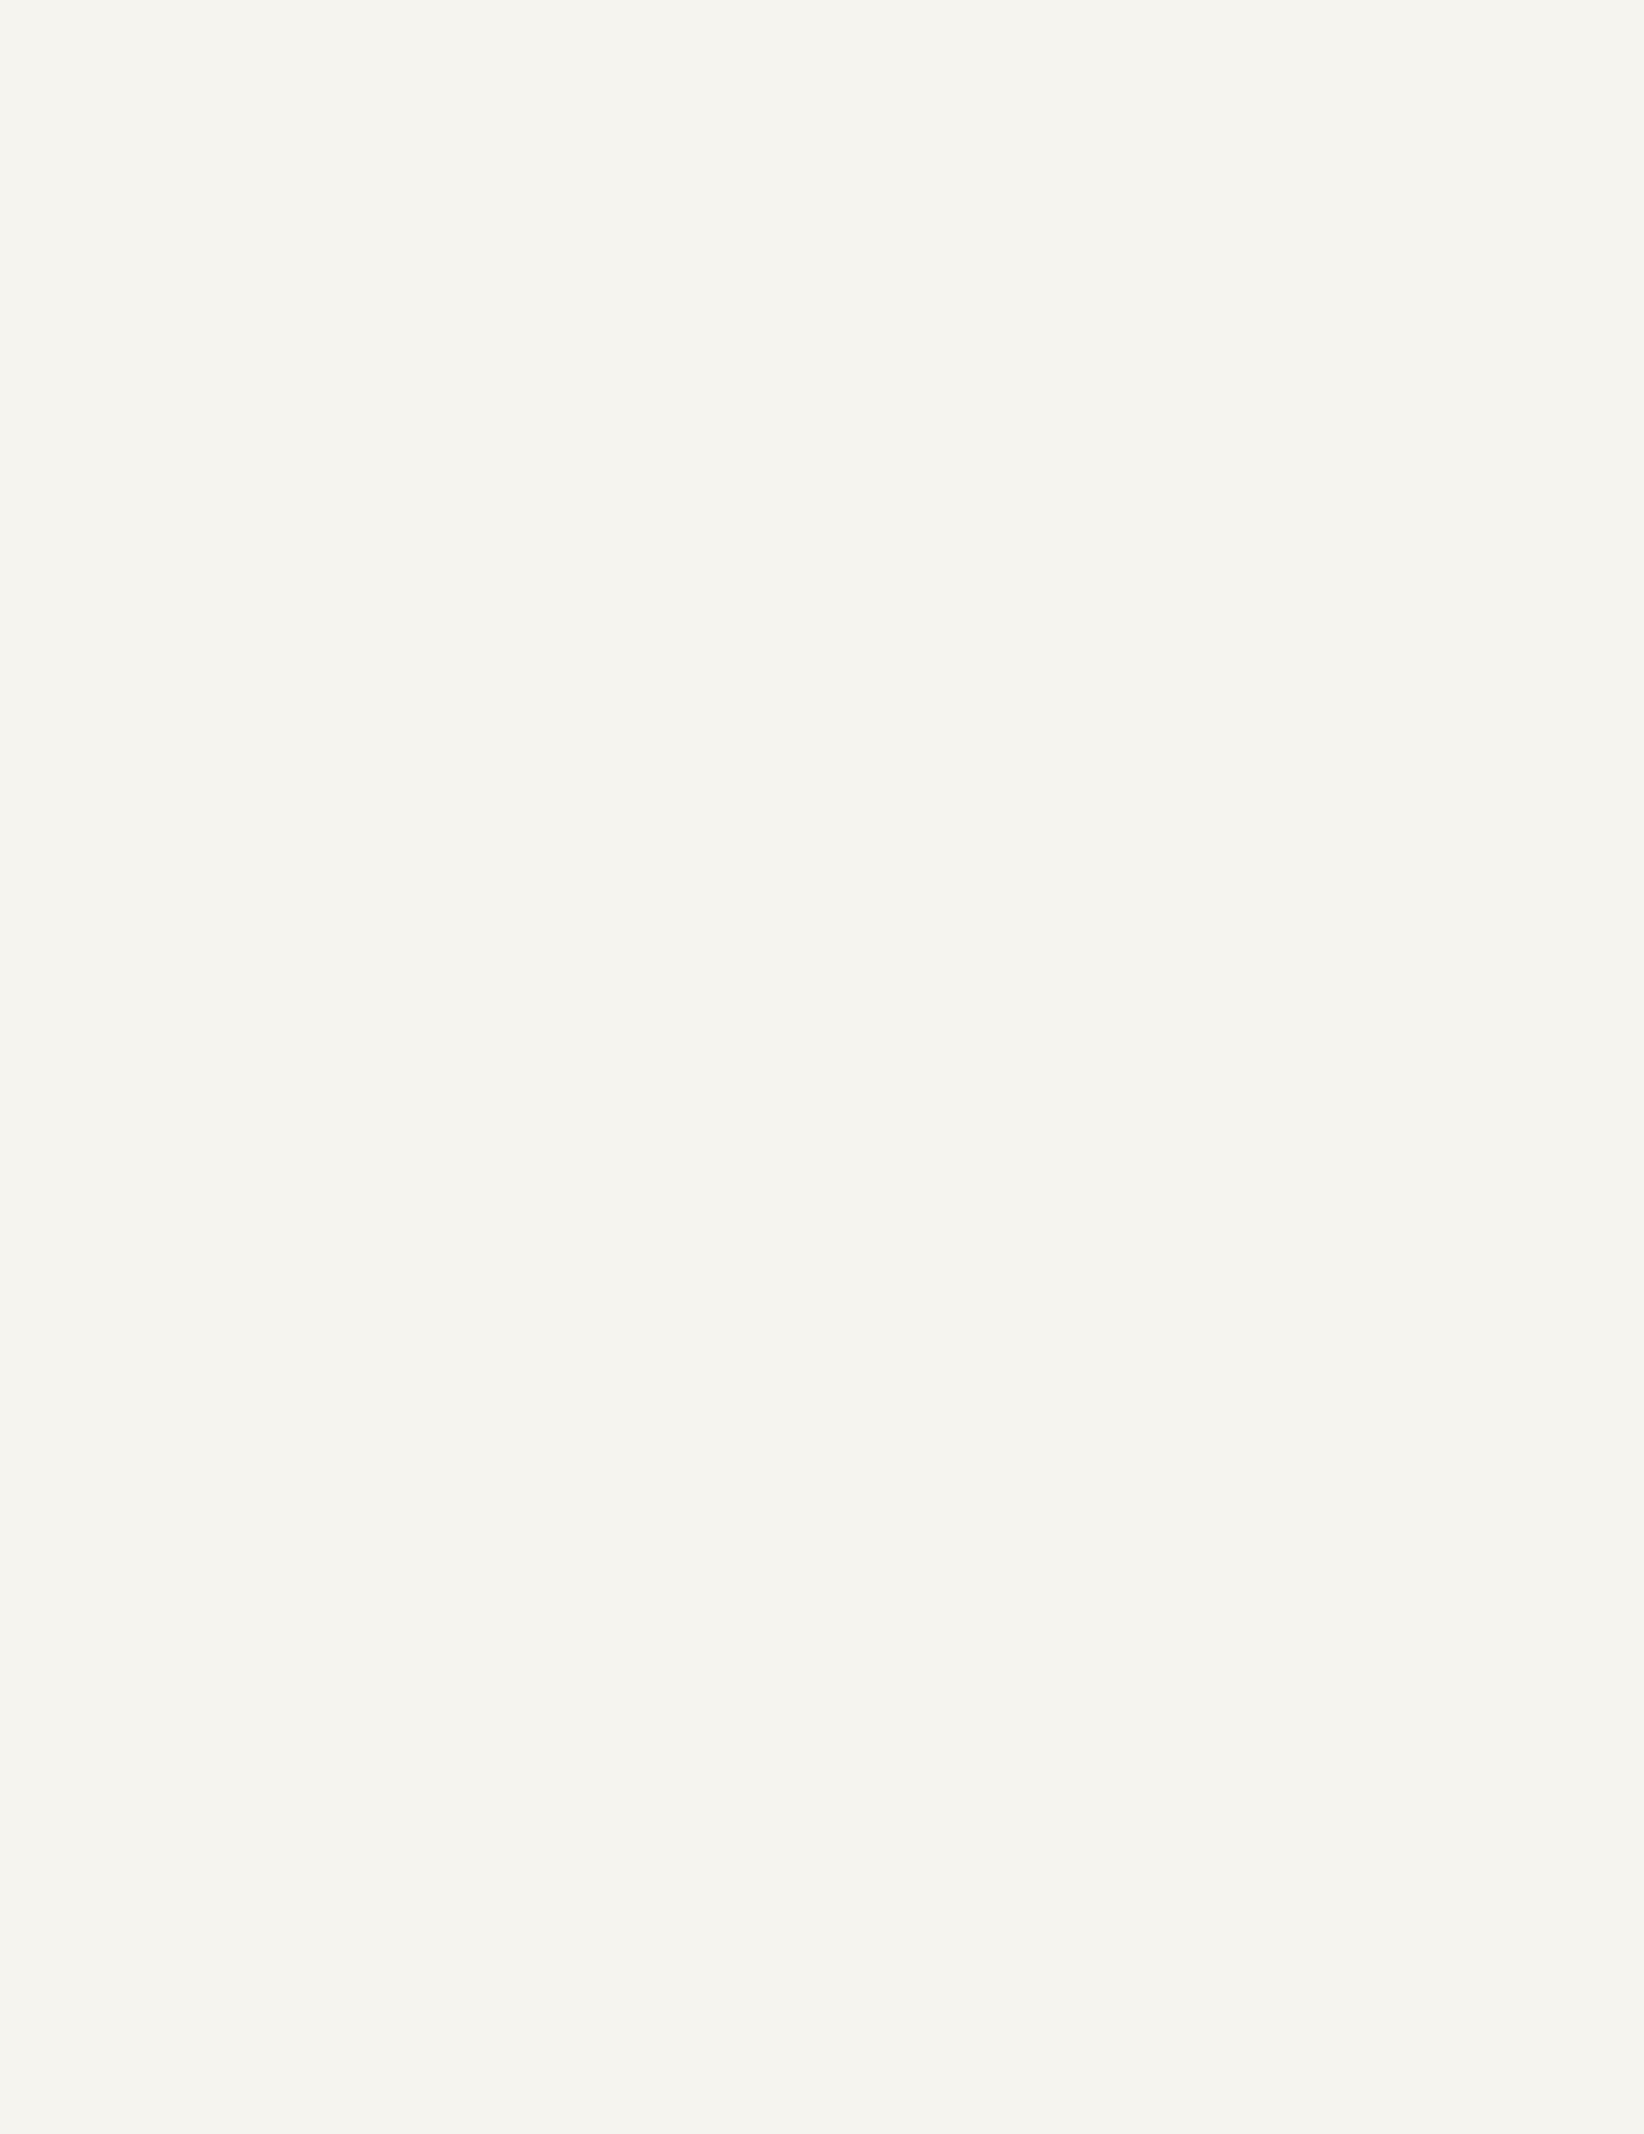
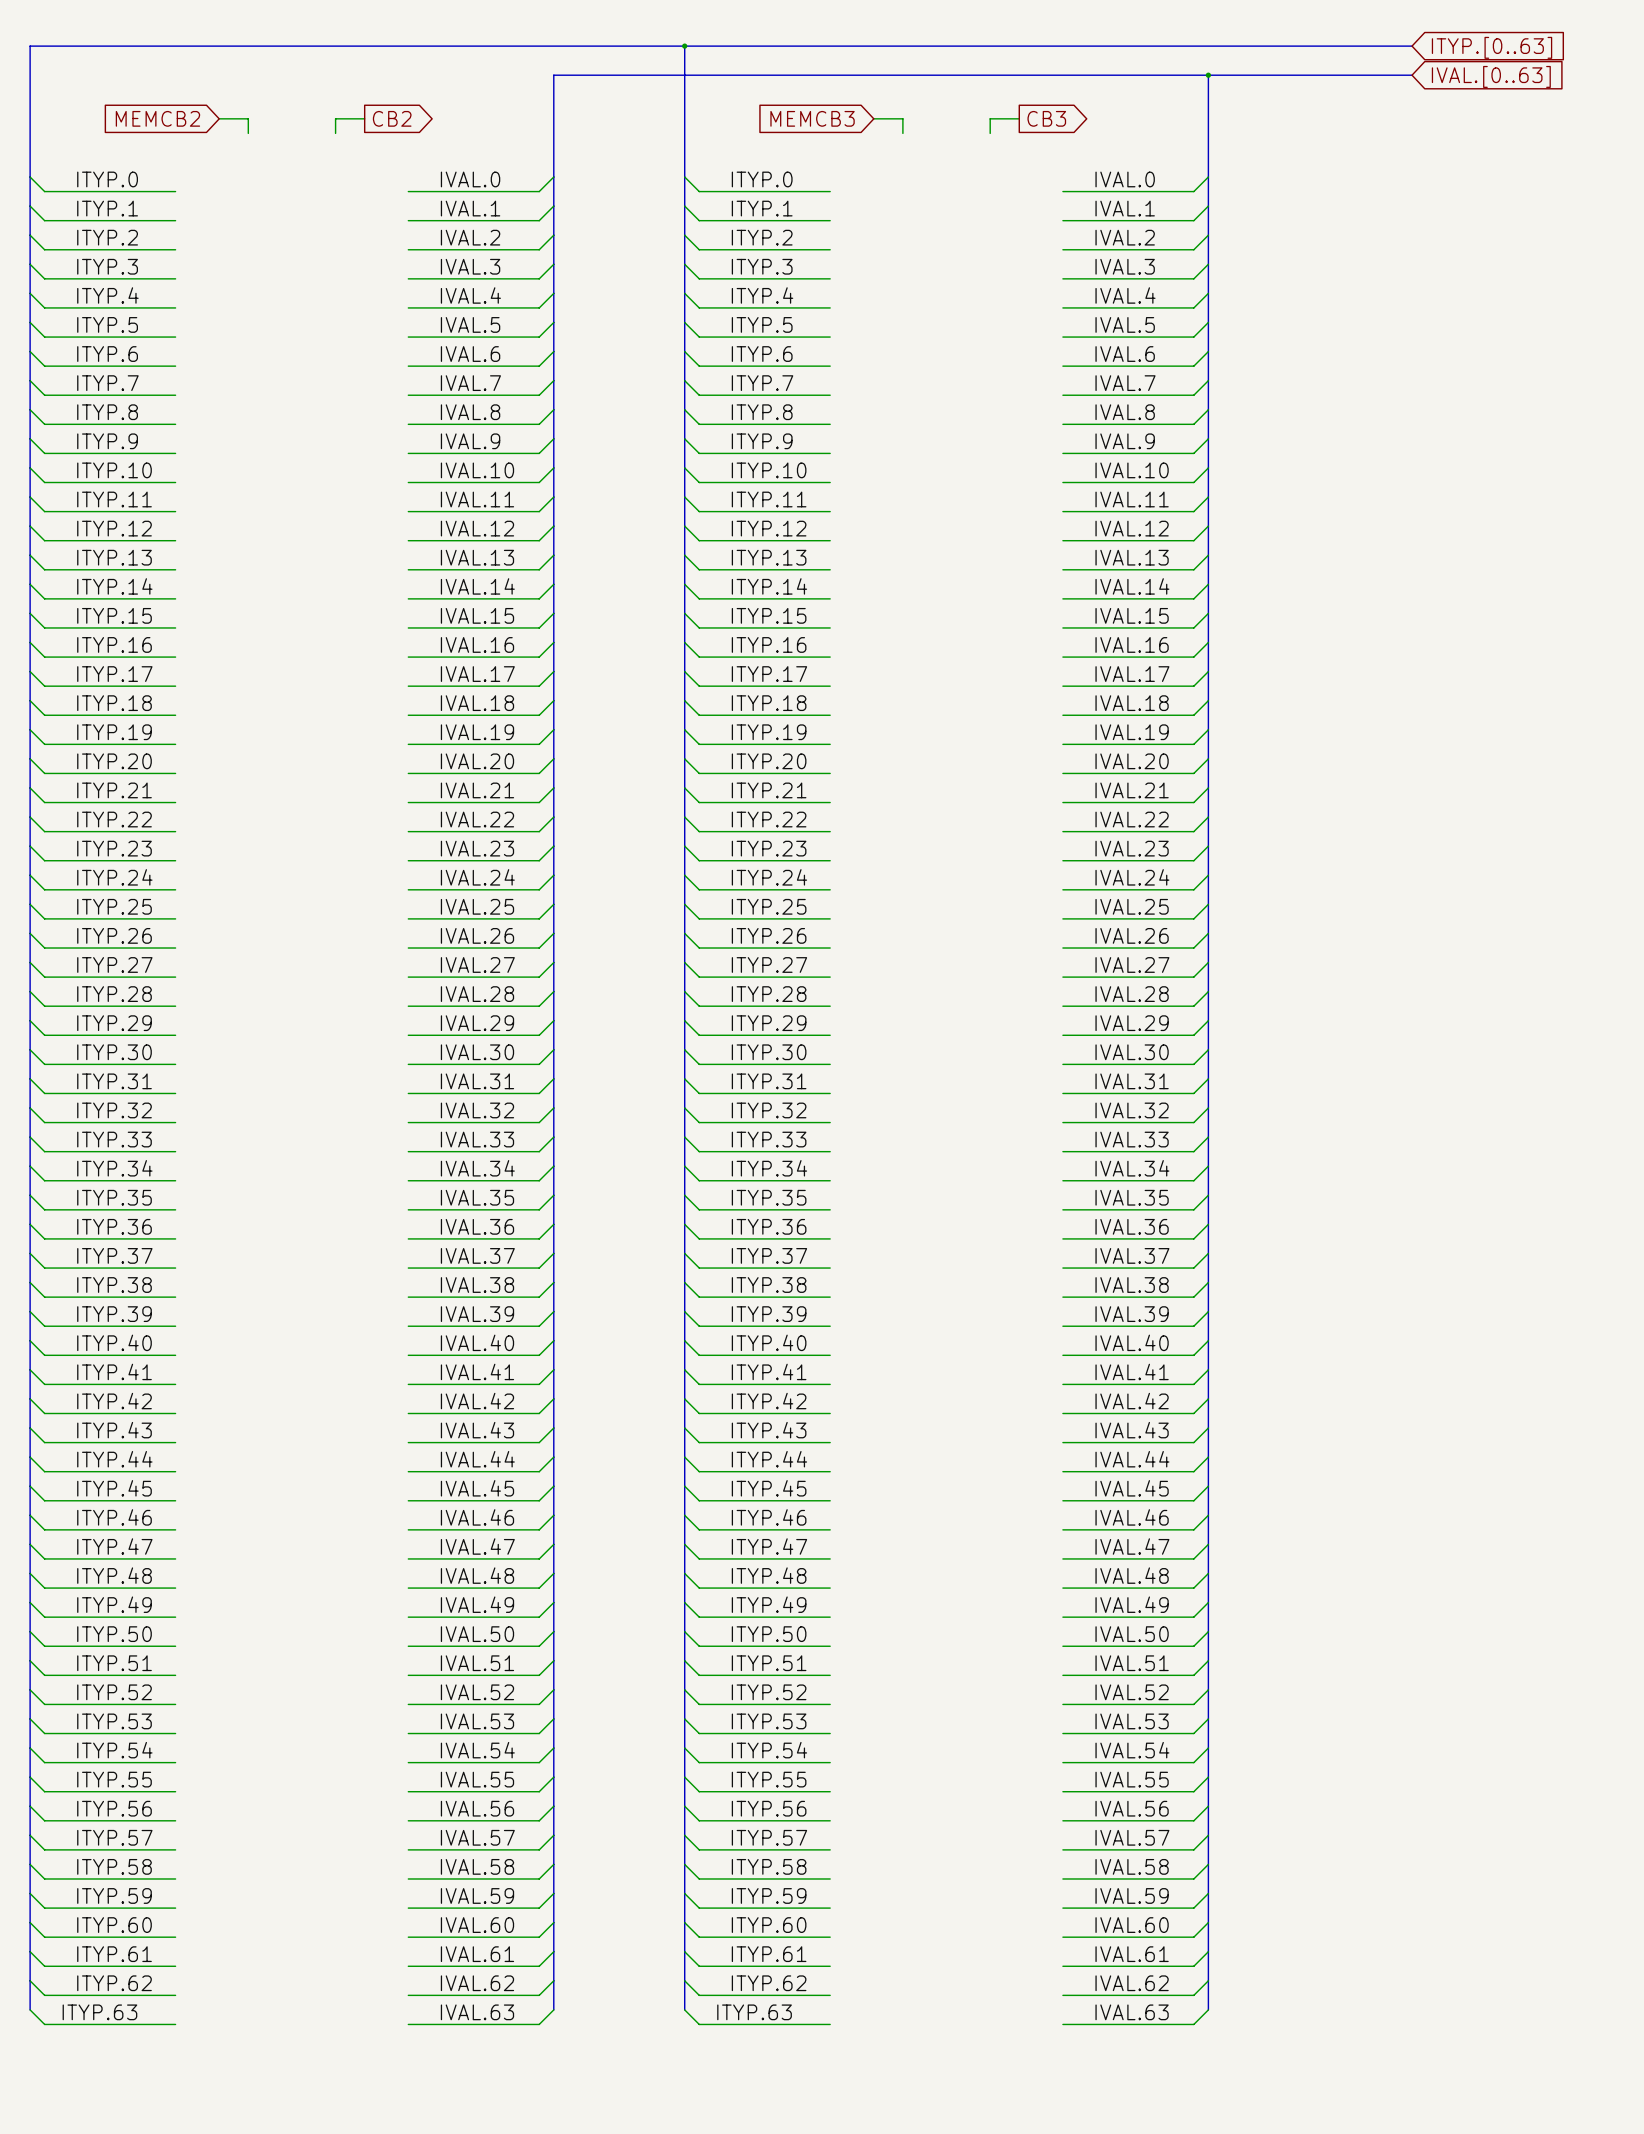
bus: none -> (684, 46) (684, 2009)
junction: none -> (684, 46)
bus: none -> (1412, 46) (30, 46) (30, 2009)
global label: none -> ITYP.[0..63] (1492, 47)
bus: none -> (1208, 75) (1208, 2009)
junction: none -> (1208, 75)
bus: none -> (1412, 75) (553, 75) (553, 2009)
global label: none -> IVAL.[0..63] (1491, 76)
global label: none -> MEMCB2 (157, 118)
wire: none -> (219, 118) (248, 118) (248, 133)
wire: none -> (364, 118) (335, 118) (335, 133)
global label: none -> CB2 (392, 118)
global label: none -> MEMCB3 (812, 118)
wire: none -> (873, 118) (902, 118) (902, 133)
wire: none -> (1019, 118) (990, 118) (990, 133)
global label: none -> CB3 (1046, 118)
wire: none -> (30, 177) (44, 191) (175, 191)
wire: none -> (553, 177) (539, 191) (408, 191)
wire: none -> (684, 177) (699, 191) (830, 191)
wire: none -> (1208, 177) (1193, 191) (1062, 191)
label: none -> ITYP.0 (107, 179)
label: none -> IVAL.0 (470, 179)
label: none -> ITYP.0 (762, 179)
label: none -> IVAL.0 (1125, 179)
wire: none -> (30, 206) (44, 220) (175, 220)
wire: none -> (553, 206) (539, 220) (408, 220)
wire: none -> (684, 206) (699, 220) (830, 220)
wire: none -> (1208, 206) (1193, 220) (1062, 220)
label: none -> ITYP.1 (107, 208)
label: none -> IVAL.1 (470, 208)
label: none -> ITYP.1 (762, 208)
label: none -> IVAL.1 (1125, 208)
wire: none -> (30, 235) (44, 249) (175, 249)
wire: none -> (553, 235) (539, 249) (408, 249)
wire: none -> (684, 235) (699, 249) (830, 249)
wire: none -> (1208, 235) (1193, 249) (1062, 249)
label: none -> ITYP.2 (107, 237)
label: none -> IVAL.2 (470, 237)
label: none -> ITYP.2 (762, 237)
label: none -> IVAL.2 (1125, 237)
wire: none -> (30, 264) (44, 278) (175, 278)
wire: none -> (553, 264) (539, 278) (408, 278)
wire: none -> (684, 264) (699, 278) (830, 278)
wire: none -> (1208, 264) (1193, 278) (1062, 278)
label: none -> ITYP.3 (107, 266)
label: none -> IVAL.3 (470, 266)
label: none -> ITYP.3 (762, 266)
label: none -> IVAL.3 (1125, 266)
wire: none -> (30, 293) (44, 307) (175, 307)
wire: none -> (553, 293) (539, 307) (408, 307)
wire: none -> (684, 293) (699, 307) (830, 307)
wire: none -> (1208, 293) (1193, 307) (1062, 307)
label: none -> ITYP.4 (107, 295)
label: none -> IVAL.4 (470, 295)
label: none -> ITYP.4 (762, 295)
label: none -> IVAL.4 (1125, 295)
wire: none -> (30, 322) (44, 337) (175, 337)
wire: none -> (553, 322) (539, 337) (408, 337)
wire: none -> (684, 322) (699, 337) (830, 337)
wire: none -> (1208, 322) (1193, 337) (1062, 337)
label: none -> ITYP.5 (107, 324)
label: none -> IVAL.5 (470, 324)
label: none -> ITYP.5 (762, 324)
label: none -> IVAL.5 (1125, 324)
wire: none -> (30, 351) (44, 366) (175, 366)
wire: none -> (553, 351) (539, 366) (408, 366)
wire: none -> (684, 351) (699, 366) (830, 366)
wire: none -> (1208, 351) (1193, 366) (1062, 366)
label: none -> ITYP.6 (107, 354)
label: none -> IVAL.6 (470, 354)
label: none -> ITYP.6 (762, 354)
label: none -> IVAL.6 (1125, 354)
wire: none -> (30, 380) (44, 395) (175, 395)
wire: none -> (553, 380) (539, 395) (408, 395)
wire: none -> (684, 380) (699, 395) (830, 395)
wire: none -> (1208, 380) (1193, 395) (1062, 395)
label: none -> ITYP.7 (107, 383)
label: none -> IVAL.7 (470, 383)
label: none -> ITYP.7 (762, 383)
label: none -> IVAL.7 (1125, 383)
wire: none -> (30, 409) (44, 424) (175, 424)
wire: none -> (553, 409) (539, 424) (408, 424)
wire: none -> (684, 409) (699, 424) (830, 424)
wire: none -> (1208, 409) (1193, 424) (1062, 424)
label: none -> ITYP.8 (107, 412)
label: none -> IVAL.8 (470, 412)
label: none -> ITYP.8 (762, 412)
label: none -> IVAL.8 (1125, 412)
wire: none -> (30, 438) (44, 453) (175, 453)
wire: none -> (553, 438) (539, 453) (408, 453)
wire: none -> (684, 438) (699, 453) (830, 453)
wire: none -> (1208, 438) (1193, 453) (1062, 453)
label: none -> ITYP.9 (107, 441)
label: none -> IVAL.9 (470, 441)
label: none -> ITYP.9 (762, 441)
label: none -> IVAL.9 (1125, 441)
wire: none -> (30, 467) (44, 482) (175, 482)
wire: none -> (553, 467) (539, 482) (408, 482)
wire: none -> (684, 467) (699, 482) (830, 482)
wire: none -> (1208, 467) (1193, 482) (1062, 482)
label: none -> ITYP.10 (114, 470)
label: none -> IVAL.10 (477, 470)
label: none -> ITYP.10 (769, 470)
label: none -> IVAL.10 (1132, 470)
wire: none -> (30, 497) (44, 511) (175, 511)
wire: none -> (553, 497) (539, 511) (408, 511)
wire: none -> (684, 497) (699, 511) (830, 511)
wire: none -> (1208, 497) (1193, 511) (1062, 511)
label: none -> ITYP.11 (114, 499)
label: none -> IVAL.11 (477, 499)
label: none -> ITYP.11 (769, 499)
label: none -> IVAL.11 (1132, 499)
wire: none -> (30, 526) (44, 540) (175, 540)
wire: none -> (553, 526) (539, 540) (408, 540)
wire: none -> (684, 526) (699, 540) (830, 540)
wire: none -> (1208, 526) (1193, 540) (1062, 540)
label: none -> ITYP.12 (114, 528)
label: none -> IVAL.12 (477, 528)
label: none -> ITYP.12 (769, 528)
label: none -> IVAL.12 (1132, 528)
wire: none -> (30, 555) (44, 569) (175, 569)
wire: none -> (553, 555) (539, 569) (408, 569)
wire: none -> (684, 555) (699, 569) (830, 569)
wire: none -> (1208, 555) (1193, 569) (1062, 569)
label: none -> ITYP.13 (114, 557)
label: none -> IVAL.13 (477, 557)
label: none -> ITYP.13 (769, 557)
label: none -> IVAL.13 (1132, 557)
wire: none -> (30, 584) (44, 598) (175, 598)
wire: none -> (553, 584) (539, 598) (408, 598)
wire: none -> (684, 584) (699, 598) (830, 598)
wire: none -> (1208, 584) (1193, 598) (1062, 598)
label: none -> ITYP.14 (114, 586)
label: none -> IVAL.14 (477, 586)
label: none -> ITYP.14 (769, 586)
label: none -> IVAL.14 (1132, 586)
wire: none -> (30, 613) (44, 627) (175, 627)
wire: none -> (553, 613) (539, 627) (408, 627)
wire: none -> (684, 613) (699, 627) (830, 627)
wire: none -> (1208, 613) (1193, 627) (1062, 627)
label: none -> ITYP.15 (114, 615)
label: none -> IVAL.15 (477, 615)
label: none -> ITYP.15 (769, 615)
label: none -> IVAL.15 (1132, 615)
wire: none -> (30, 642) (44, 657) (175, 657)
wire: none -> (553, 642) (539, 657) (408, 657)
wire: none -> (684, 642) (699, 657) (830, 657)
wire: none -> (1208, 642) (1193, 657) (1062, 657)
label: none -> ITYP.16 (114, 644)
label: none -> IVAL.16 (477, 644)
label: none -> ITYP.16 (769, 644)
label: none -> IVAL.16 (1132, 644)
wire: none -> (30, 671) (44, 686) (175, 686)
wire: none -> (553, 671) (539, 686) (408, 686)
wire: none -> (684, 671) (699, 686) (830, 686)
wire: none -> (1208, 671) (1193, 686) (1062, 686)
label: none -> ITYP.17 (114, 674)
label: none -> IVAL.17 (477, 674)
label: none -> ITYP.17 (769, 674)
label: none -> IVAL.17 (1132, 674)
wire: none -> (30, 700) (44, 715) (175, 715)
wire: none -> (553, 700) (539, 715) (408, 715)
wire: none -> (684, 700) (699, 715) (830, 715)
wire: none -> (1208, 700) (1193, 715) (1062, 715)
label: none -> ITYP.18 (114, 703)
label: none -> IVAL.18 (477, 703)
label: none -> ITYP.18 (769, 703)
label: none -> IVAL.18 (1132, 703)
wire: none -> (30, 729) (44, 744) (175, 744)
wire: none -> (553, 729) (539, 744) (408, 744)
wire: none -> (684, 729) (699, 744) (830, 744)
wire: none -> (1208, 729) (1193, 744) (1062, 744)
label: none -> ITYP.19 (114, 732)
label: none -> IVAL.19 (477, 732)
label: none -> ITYP.19 (769, 732)
label: none -> IVAL.19 (1132, 732)
wire: none -> (30, 758) (44, 773) (175, 773)
wire: none -> (553, 758) (539, 773) (408, 773)
wire: none -> (684, 758) (699, 773) (830, 773)
wire: none -> (1208, 758) (1193, 773) (1062, 773)
label: none -> ITYP.20 (114, 761)
label: none -> IVAL.20 (477, 761)
label: none -> ITYP.20 (769, 761)
label: none -> IVAL.20 (1132, 761)
wire: none -> (30, 787) (44, 802) (175, 802)
wire: none -> (553, 787) (539, 802) (408, 802)
wire: none -> (684, 787) (699, 802) (830, 802)
wire: none -> (1208, 787) (1193, 802) (1062, 802)
label: none -> ITYP.21 (114, 790)
label: none -> IVAL.21 (477, 790)
label: none -> ITYP.21 (769, 790)
label: none -> IVAL.21 (1132, 790)
wire: none -> (30, 817) (44, 831) (175, 831)
wire: none -> (553, 817) (539, 831) (408, 831)
wire: none -> (684, 817) (699, 831) (830, 831)
wire: none -> (1208, 817) (1193, 831) (1062, 831)
label: none -> ITYP.22 (114, 819)
label: none -> IVAL.22 (477, 819)
label: none -> ITYP.22 (769, 819)
label: none -> IVAL.22 (1132, 819)
wire: none -> (30, 846) (44, 860) (175, 860)
wire: none -> (553, 846) (539, 860) (408, 860)
wire: none -> (684, 846) (699, 860) (830, 860)
wire: none -> (1208, 846) (1193, 860) (1062, 860)
label: none -> ITYP.23 (114, 848)
label: none -> IVAL.23 (477, 848)
label: none -> ITYP.23 (769, 848)
label: none -> IVAL.23 (1132, 848)
wire: none -> (30, 875) (44, 889) (175, 889)
wire: none -> (553, 875) (539, 889) (408, 889)
wire: none -> (684, 875) (699, 889) (830, 889)
wire: none -> (1208, 875) (1193, 889) (1062, 889)
label: none -> ITYP.24 (114, 877)
label: none -> IVAL.24 (477, 877)
label: none -> ITYP.24 (769, 877)
label: none -> IVAL.24 (1132, 877)
wire: none -> (30, 904) (44, 918) (175, 918)
wire: none -> (553, 904) (539, 918) (408, 918)
wire: none -> (684, 904) (699, 918) (830, 918)
wire: none -> (1208, 904) (1193, 918) (1062, 918)
label: none -> ITYP.25 (114, 906)
label: none -> IVAL.25 (477, 906)
label: none -> ITYP.25 (769, 906)
label: none -> IVAL.25 (1132, 906)
wire: none -> (30, 933) (44, 948) (175, 948)
wire: none -> (553, 933) (539, 948) (408, 948)
wire: none -> (684, 933) (699, 948) (830, 948)
wire: none -> (1208, 933) (1193, 948) (1062, 948)
label: none -> ITYP.26 (114, 935)
label: none -> IVAL.26 (477, 935)
label: none -> ITYP.26 (769, 935)
label: none -> IVAL.26 (1132, 935)
wire: none -> (30, 962) (44, 977) (175, 977)
wire: none -> (553, 962) (539, 977) (408, 977)
wire: none -> (684, 962) (699, 977) (830, 977)
wire: none -> (1208, 962) (1193, 977) (1062, 977)
label: none -> ITYP.27 (114, 964)
label: none -> IVAL.27 (477, 964)
label: none -> ITYP.27 (769, 964)
label: none -> IVAL.27 (1132, 964)
wire: none -> (30, 991) (44, 1006) (175, 1006)
wire: none -> (553, 991) (539, 1006) (408, 1006)
wire: none -> (684, 991) (699, 1006) (830, 1006)
wire: none -> (1208, 991) (1193, 1006) (1062, 1006)
label: none -> ITYP.28 (114, 994)
label: none -> IVAL.28 (477, 994)
label: none -> ITYP.28 (769, 994)
label: none -> IVAL.28 (1132, 994)
wire: none -> (30, 1020) (44, 1035) (175, 1035)
wire: none -> (553, 1020) (539, 1035) (408, 1035)
wire: none -> (684, 1020) (699, 1035) (830, 1035)
wire: none -> (1208, 1020) (1193, 1035) (1062, 1035)
label: none -> ITYP.29 (114, 1023)
label: none -> IVAL.29 (477, 1023)
label: none -> ITYP.29 (769, 1023)
label: none -> IVAL.29 (1132, 1023)
wire: none -> (30, 1049) (44, 1064) (175, 1064)
wire: none -> (553, 1049) (539, 1064) (408, 1064)
wire: none -> (684, 1049) (699, 1064) (830, 1064)
wire: none -> (1208, 1049) (1193, 1064) (1062, 1064)
label: none -> ITYP.30 (114, 1052)
label: none -> IVAL.30 (477, 1052)
label: none -> ITYP.30 (769, 1052)
label: none -> IVAL.30 (1132, 1052)
wire: none -> (30, 1078) (44, 1093) (175, 1093)
wire: none -> (553, 1078) (539, 1093) (408, 1093)
wire: none -> (684, 1078) (699, 1093) (830, 1093)
wire: none -> (1208, 1078) (1193, 1093) (1062, 1093)
label: none -> ITYP.31 (114, 1081)
label: none -> IVAL.31 (477, 1081)
label: none -> ITYP.31 (769, 1081)
label: none -> IVAL.31 (1132, 1081)
wire: none -> (30, 1108) (44, 1122) (175, 1122)
wire: none -> (553, 1108) (539, 1122) (408, 1122)
wire: none -> (684, 1108) (699, 1122) (830, 1122)
wire: none -> (1208, 1108) (1193, 1122) (1062, 1122)
label: none -> ITYP.32 (114, 1110)
label: none -> IVAL.32 (477, 1110)
label: none -> ITYP.32 (769, 1110)
label: none -> IVAL.32 (1132, 1110)
wire: none -> (30, 1137) (44, 1151) (175, 1151)
wire: none -> (553, 1137) (539, 1151) (408, 1151)
wire: none -> (684, 1137) (699, 1151) (830, 1151)
wire: none -> (1208, 1137) (1193, 1151) (1062, 1151)
label: none -> ITYP.33 (114, 1139)
label: none -> IVAL.33 (477, 1139)
label: none -> ITYP.33 (769, 1139)
label: none -> IVAL.33 (1132, 1139)
wire: none -> (30, 1166) (44, 1180) (175, 1180)
wire: none -> (553, 1166) (539, 1180) (408, 1180)
wire: none -> (684, 1166) (699, 1180) (830, 1180)
wire: none -> (1208, 1166) (1193, 1180) (1062, 1180)
label: none -> ITYP.34 (114, 1168)
label: none -> IVAL.34 (477, 1168)
label: none -> ITYP.34 (769, 1168)
label: none -> IVAL.34 (1132, 1168)
wire: none -> (30, 1195) (44, 1209) (175, 1209)
wire: none -> (553, 1195) (539, 1209) (408, 1209)
wire: none -> (684, 1195) (699, 1209) (830, 1209)
wire: none -> (1208, 1195) (1193, 1209) (1062, 1209)
label: none -> ITYP.35 (114, 1197)
label: none -> IVAL.35 (477, 1197)
label: none -> ITYP.35 (769, 1197)
label: none -> IVAL.35 (1132, 1197)
wire: none -> (30, 1224) (44, 1238) (175, 1238)
wire: none -> (553, 1224) (539, 1238) (408, 1238)
wire: none -> (684, 1224) (699, 1238) (830, 1238)
wire: none -> (1208, 1224) (1193, 1238) (1062, 1238)
label: none -> ITYP.36 (114, 1226)
label: none -> IVAL.36 (477, 1226)
label: none -> ITYP.36 (769, 1226)
label: none -> IVAL.36 (1132, 1226)
wire: none -> (30, 1253) (44, 1268) (175, 1268)
wire: none -> (553, 1253) (539, 1268) (408, 1268)
wire: none -> (684, 1253) (699, 1268) (830, 1268)
wire: none -> (1208, 1253) (1193, 1268) (1062, 1268)
label: none -> ITYP.37 (114, 1255)
label: none -> IVAL.37 (477, 1255)
label: none -> ITYP.37 (769, 1255)
label: none -> IVAL.37 (1132, 1255)
wire: none -> (30, 1282) (44, 1297) (175, 1297)
wire: none -> (553, 1282) (539, 1297) (408, 1297)
wire: none -> (684, 1282) (699, 1297) (830, 1297)
wire: none -> (1208, 1282) (1193, 1297) (1062, 1297)
label: none -> ITYP.38 (114, 1285)
label: none -> IVAL.38 (477, 1285)
label: none -> ITYP.38 (769, 1285)
label: none -> IVAL.38 (1132, 1285)
wire: none -> (30, 1311) (44, 1326) (175, 1326)
wire: none -> (553, 1311) (539, 1326) (408, 1326)
wire: none -> (684, 1311) (699, 1326) (830, 1326)
wire: none -> (1208, 1311) (1193, 1326) (1062, 1326)
label: none -> ITYP.39 (114, 1314)
label: none -> IVAL.39 (477, 1314)
label: none -> ITYP.39 (769, 1314)
label: none -> IVAL.39 (1132, 1314)
wire: none -> (30, 1340) (44, 1355) (175, 1355)
wire: none -> (553, 1340) (539, 1355) (408, 1355)
wire: none -> (684, 1340) (699, 1355) (830, 1355)
wire: none -> (1208, 1340) (1193, 1355) (1062, 1355)
label: none -> ITYP.40 (114, 1342)
label: none -> IVAL.40 (477, 1342)
label: none -> ITYP.40 (769, 1342)
label: none -> IVAL.40 (1132, 1342)
wire: none -> (30, 1369) (44, 1384) (175, 1384)
wire: none -> (553, 1369) (539, 1384) (408, 1384)
wire: none -> (684, 1369) (699, 1384) (830, 1384)
wire: none -> (1208, 1369) (1193, 1384) (1062, 1384)
label: none -> ITYP.41 (114, 1371)
label: none -> IVAL.41 (477, 1371)
label: none -> ITYP.41 (769, 1371)
label: none -> IVAL.41 (1132, 1371)
wire: none -> (30, 1398) (44, 1413) (175, 1413)
wire: none -> (553, 1398) (539, 1413) (408, 1413)
wire: none -> (684, 1398) (699, 1413) (830, 1413)
wire: none -> (1208, 1398) (1193, 1413) (1062, 1413)
label: none -> ITYP.42 (114, 1401)
label: none -> IVAL.42 (477, 1401)
label: none -> ITYP.42 (769, 1401)
label: none -> IVAL.42 (1132, 1401)
wire: none -> (30, 1428) (44, 1442) (175, 1442)
wire: none -> (553, 1428) (539, 1442) (408, 1442)
wire: none -> (684, 1428) (699, 1442) (830, 1442)
wire: none -> (1208, 1428) (1193, 1442) (1062, 1442)
label: none -> ITYP.43 (114, 1430)
label: none -> IVAL.43 (477, 1430)
label: none -> ITYP.43 (769, 1430)
label: none -> IVAL.43 (1132, 1430)
wire: none -> (30, 1457) (44, 1471) (175, 1471)
wire: none -> (553, 1457) (539, 1471) (408, 1471)
wire: none -> (684, 1457) (699, 1471) (830, 1471)
wire: none -> (1208, 1457) (1193, 1471) (1062, 1471)
label: none -> ITYP.44 (114, 1459)
label: none -> IVAL.44 (477, 1459)
label: none -> ITYP.44 (769, 1459)
label: none -> IVAL.44 (1132, 1459)
wire: none -> (30, 1486) (44, 1500) (175, 1500)
wire: none -> (553, 1486) (539, 1500) (408, 1500)
wire: none -> (684, 1486) (699, 1500) (830, 1500)
wire: none -> (1208, 1486) (1193, 1500) (1062, 1500)
label: none -> ITYP.45 (114, 1488)
label: none -> IVAL.45 (477, 1488)
label: none -> ITYP.45 (769, 1488)
label: none -> IVAL.45 (1132, 1488)
wire: none -> (30, 1515) (44, 1529) (175, 1529)
wire: none -> (553, 1515) (539, 1529) (408, 1529)
wire: none -> (684, 1515) (699, 1529) (830, 1529)
wire: none -> (1208, 1515) (1193, 1529) (1062, 1529)
label: none -> ITYP.46 (114, 1517)
label: none -> IVAL.46 (477, 1517)
label: none -> ITYP.46 (769, 1517)
label: none -> IVAL.46 (1132, 1517)
wire: none -> (30, 1544) (44, 1558) (175, 1558)
wire: none -> (553, 1544) (539, 1558) (408, 1558)
wire: none -> (684, 1544) (699, 1558) (830, 1558)
wire: none -> (1208, 1544) (1193, 1558) (1062, 1558)
label: none -> ITYP.47 (114, 1546)
label: none -> IVAL.47 (477, 1546)
label: none -> ITYP.47 (769, 1546)
label: none -> IVAL.47 (1132, 1546)
wire: none -> (30, 1573) (44, 1588) (175, 1588)
wire: none -> (553, 1573) (539, 1588) (408, 1588)
wire: none -> (684, 1573) (699, 1588) (830, 1588)
wire: none -> (1208, 1573) (1193, 1588) (1062, 1588)
label: none -> ITYP.48 (114, 1575)
label: none -> IVAL.48 (477, 1575)
label: none -> ITYP.48 (769, 1575)
label: none -> IVAL.48 (1132, 1575)
wire: none -> (30, 1602) (44, 1617) (175, 1617)
wire: none -> (553, 1602) (539, 1617) (408, 1617)
wire: none -> (684, 1602) (699, 1617) (830, 1617)
wire: none -> (1208, 1602) (1193, 1617) (1062, 1617)
label: none -> ITYP.49 (114, 1604)
label: none -> IVAL.49 (477, 1604)
label: none -> ITYP.49 (769, 1604)
label: none -> IVAL.49 (1132, 1604)
wire: none -> (30, 1631) (44, 1646) (175, 1646)
wire: none -> (553, 1631) (539, 1646) (408, 1646)
wire: none -> (684, 1631) (699, 1646) (830, 1646)
wire: none -> (1208, 1631) (1193, 1646) (1062, 1646)
label: none -> ITYP.50 (114, 1634)
label: none -> IVAL.50 (477, 1634)
label: none -> ITYP.50 (769, 1634)
label: none -> IVAL.50 (1132, 1634)
wire: none -> (30, 1660) (44, 1675) (175, 1675)
wire: none -> (553, 1660) (539, 1675) (408, 1675)
wire: none -> (684, 1660) (699, 1675) (830, 1675)
wire: none -> (1208, 1660) (1193, 1675) (1062, 1675)
label: none -> ITYP.51 (114, 1663)
label: none -> IVAL.51 (477, 1663)
label: none -> ITYP.51 (769, 1663)
label: none -> IVAL.51 (1132, 1663)
wire: none -> (30, 1689) (44, 1704) (175, 1704)
wire: none -> (553, 1689) (539, 1704) (408, 1704)
wire: none -> (684, 1689) (699, 1704) (830, 1704)
wire: none -> (1208, 1689) (1193, 1704) (1062, 1704)
label: none -> ITYP.52 (114, 1692)
label: none -> IVAL.52 (477, 1692)
label: none -> ITYP.52 (769, 1692)
label: none -> IVAL.52 (1132, 1692)
wire: none -> (30, 1718) (44, 1733) (175, 1733)
wire: none -> (553, 1718) (539, 1733) (408, 1733)
wire: none -> (684, 1718) (699, 1733) (830, 1733)
wire: none -> (1208, 1718) (1193, 1733) (1062, 1733)
label: none -> ITYP.53 (114, 1721)
label: none -> IVAL.53 (477, 1721)
label: none -> ITYP.53 (769, 1721)
label: none -> IVAL.53 (1132, 1721)
wire: none -> (30, 1748) (44, 1762) (175, 1762)
wire: none -> (553, 1748) (539, 1762) (408, 1762)
wire: none -> (684, 1748) (699, 1762) (830, 1762)
wire: none -> (1208, 1748) (1193, 1762) (1062, 1762)
label: none -> ITYP.54 (114, 1750)
label: none -> IVAL.54 (477, 1750)
label: none -> ITYP.54 (769, 1750)
label: none -> IVAL.54 (1132, 1750)
wire: none -> (30, 1777) (44, 1791) (175, 1791)
wire: none -> (553, 1777) (539, 1791) (408, 1791)
wire: none -> (684, 1777) (699, 1791) (830, 1791)
wire: none -> (1208, 1777) (1193, 1791) (1062, 1791)
label: none -> ITYP.55 (114, 1779)
label: none -> IVAL.55 (477, 1779)
label: none -> ITYP.55 (769, 1779)
label: none -> IVAL.55 (1132, 1779)
wire: none -> (30, 1806) (44, 1820) (175, 1820)
wire: none -> (553, 1806) (539, 1820) (408, 1820)
wire: none -> (684, 1806) (699, 1820) (830, 1820)
wire: none -> (1208, 1806) (1193, 1820) (1062, 1820)
label: none -> ITYP.56 (114, 1808)
label: none -> IVAL.56 (477, 1808)
label: none -> ITYP.56 (769, 1808)
label: none -> IVAL.56 (1132, 1808)
wire: none -> (30, 1835) (44, 1849) (175, 1849)
wire: none -> (553, 1835) (539, 1849) (408, 1849)
wire: none -> (684, 1835) (699, 1849) (830, 1849)
wire: none -> (1208, 1835) (1193, 1849) (1062, 1849)
label: none -> ITYP.57 (114, 1837)
label: none -> IVAL.57 (477, 1837)
label: none -> ITYP.57 (769, 1837)
label: none -> IVAL.57 (1132, 1837)
wire: none -> (30, 1864) (44, 1878) (175, 1878)
wire: none -> (553, 1864) (539, 1878) (408, 1878)
wire: none -> (684, 1864) (699, 1878) (830, 1878)
wire: none -> (1208, 1864) (1193, 1878) (1062, 1878)
label: none -> ITYP.58 (114, 1866)
label: none -> IVAL.58 (477, 1866)
label: none -> ITYP.58 (769, 1866)
label: none -> IVAL.58 (1132, 1866)
wire: none -> (30, 1893) (44, 1908) (175, 1908)
wire: none -> (553, 1893) (539, 1908) (408, 1908)
wire: none -> (684, 1893) (699, 1908) (830, 1908)
wire: none -> (1208, 1893) (1193, 1908) (1062, 1908)
label: none -> ITYP.59 (114, 1895)
label: none -> IVAL.59 (477, 1895)
label: none -> ITYP.59 (769, 1895)
label: none -> IVAL.59 (1132, 1895)
wire: none -> (30, 1922) (44, 1937) (175, 1937)
wire: none -> (553, 1922) (539, 1937) (408, 1937)
wire: none -> (684, 1922) (699, 1937) (830, 1937)
wire: none -> (1208, 1922) (1193, 1937) (1062, 1937)
label: none -> ITYP.60 (114, 1925)
label: none -> IVAL.60 (477, 1925)
label: none -> ITYP.60 (769, 1925)
label: none -> IVAL.60 (1132, 1925)
wire: none -> (30, 1951) (44, 1966) (175, 1966)
wire: none -> (553, 1951) (539, 1966) (408, 1966)
wire: none -> (684, 1951) (699, 1966) (830, 1966)
wire: none -> (1208, 1951) (1193, 1966) (1062, 1966)
label: none -> ITYP.61 (114, 1954)
label: none -> IVAL.61 (477, 1954)
label: none -> ITYP.61 (769, 1954)
label: none -> IVAL.61 (1132, 1954)
wire: none -> (30, 1980) (44, 1995) (175, 1995)
wire: none -> (553, 1980) (539, 1995) (408, 1995)
wire: none -> (684, 1980) (699, 1995) (830, 1995)
wire: none -> (1208, 1980) (1193, 1995) (1062, 1995)
label: none -> ITYP.62 (114, 1983)
label: none -> IVAL.62 (477, 1983)
label: none -> ITYP.62 (769, 1983)
label: none -> IVAL.62 (1132, 1983)
wire: none -> (30, 2009) (44, 2024) (175, 2024)
wire: none -> (553, 2009) (539, 2024) (408, 2024)
wire: none -> (684, 2009) (699, 2024) (830, 2024)
wire: none -> (1208, 2009) (1193, 2024) (1062, 2024)
label: none -> ITYP.63 (99, 2012)
label: none -> IVAL.63 (477, 2012)
label: none -> ITYP.63 (754, 2012)
label: none -> IVAL.63 (1132, 2012)

